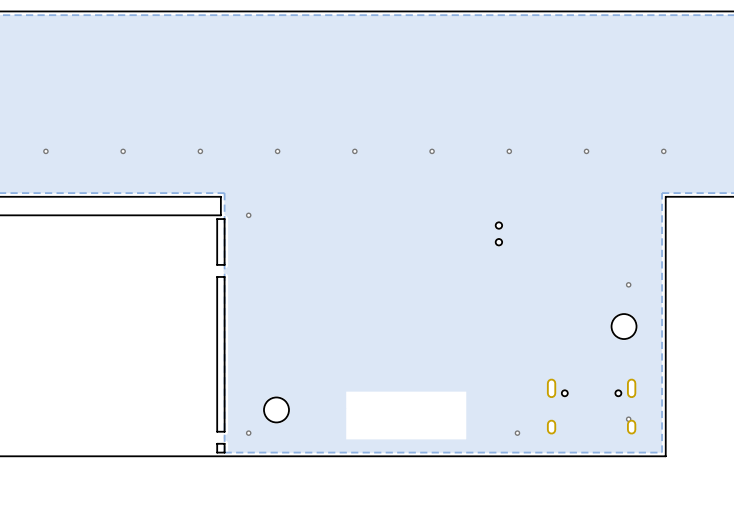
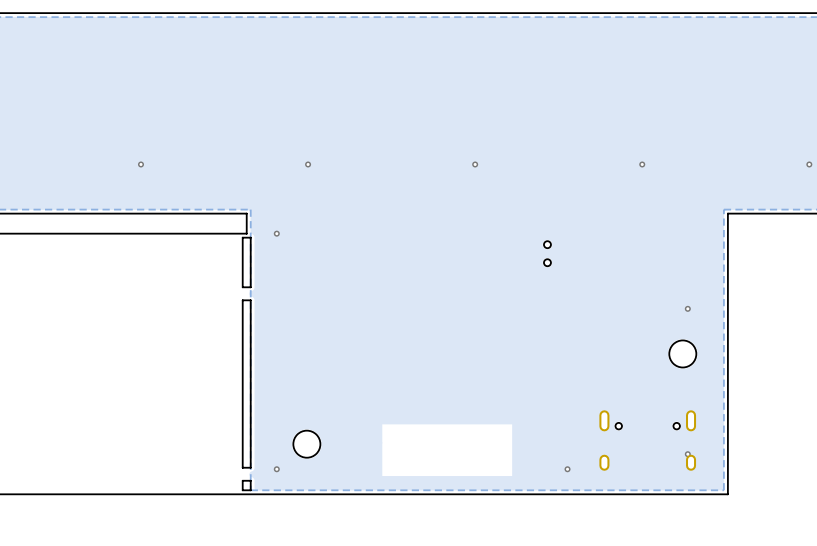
via: (45, 151) -> none
via: (200, 151) -> none
via: (354, 151) -> none
via: (509, 151) -> none
via: (663, 151) -> none

